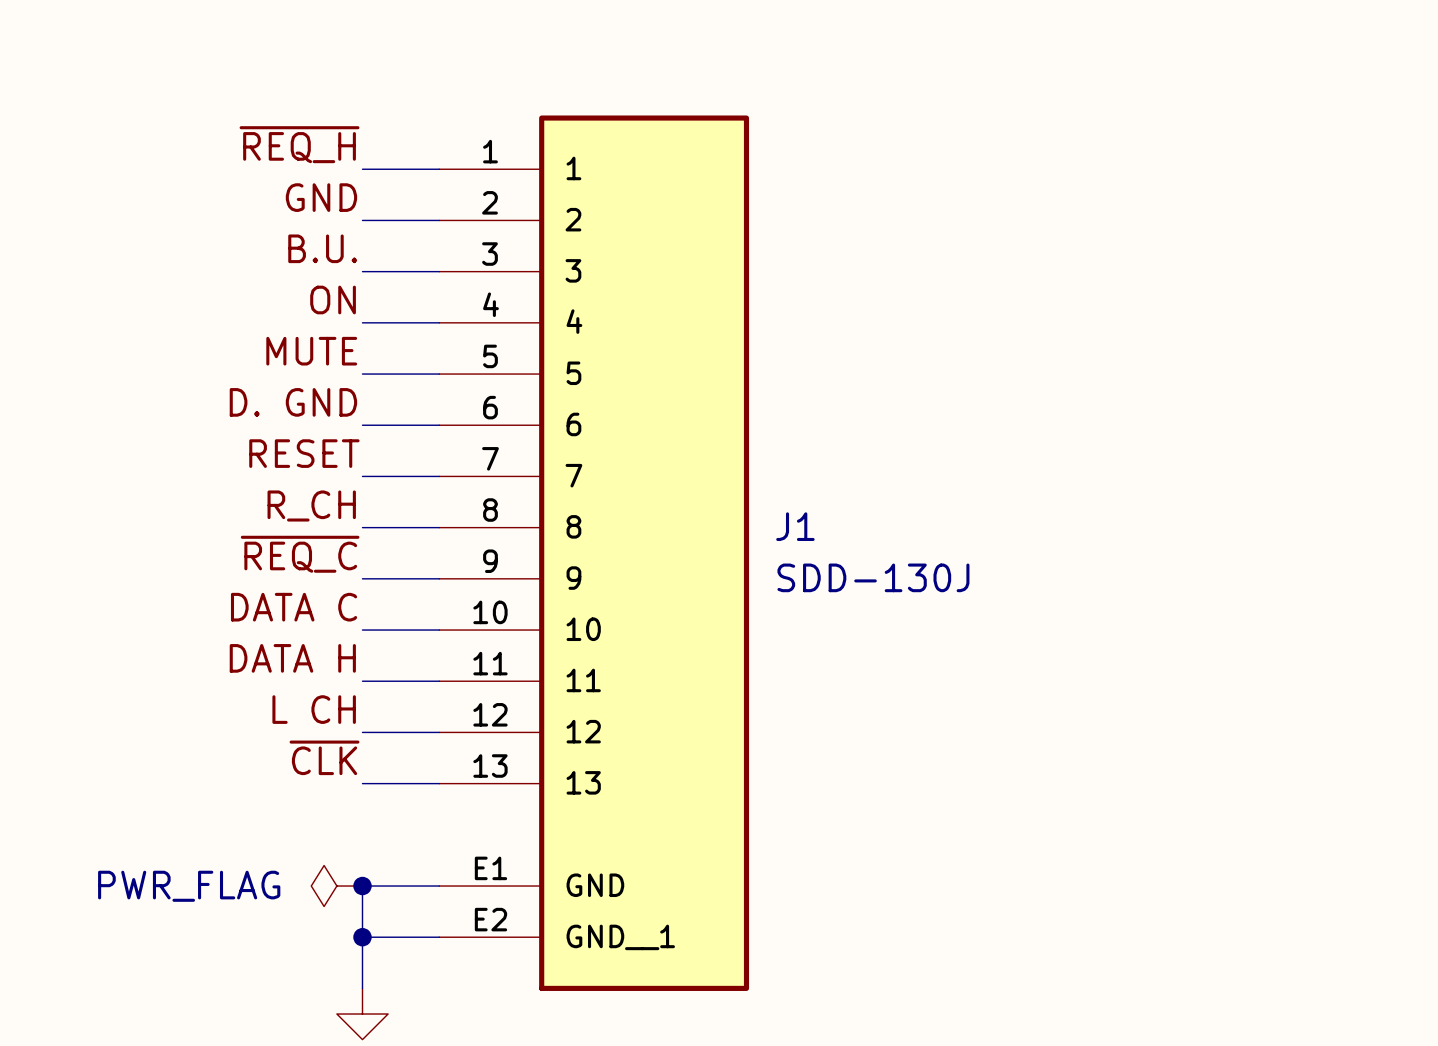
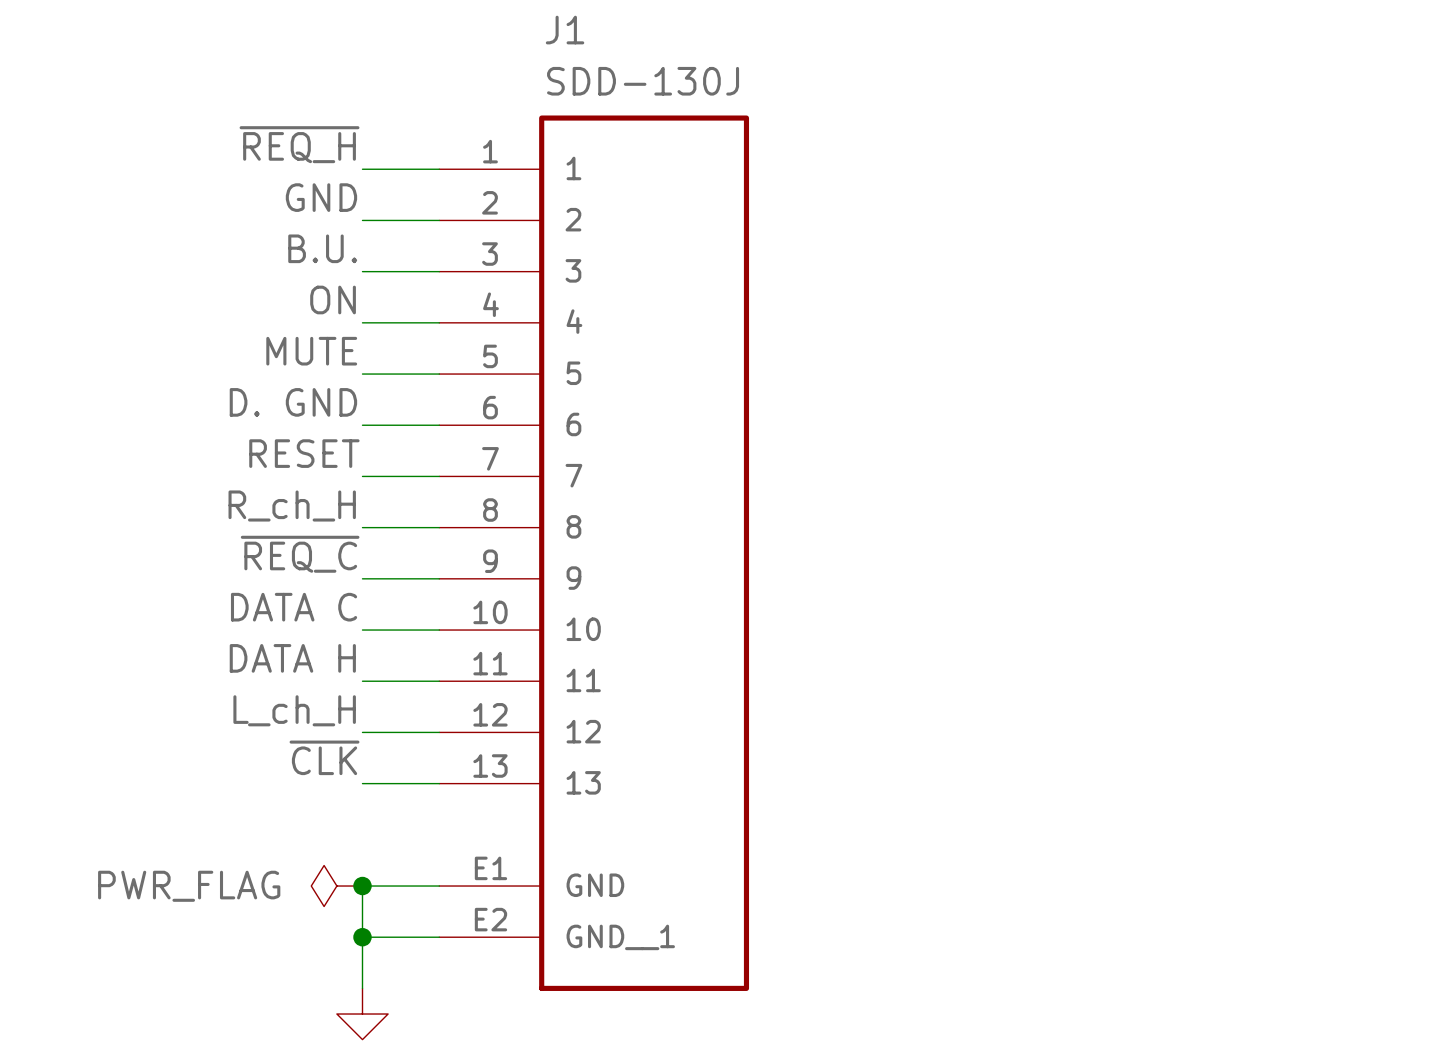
label: R_CH (311, 506) -> R_ch_H (292, 506)
J1 name position: J1 (795, 526) -> J1 (565, 30)
J1 value position: SDD-130J (873, 577) -> SDD-130J (643, 81)
label: L CH (314, 709) -> L_ch_H (294, 710)

